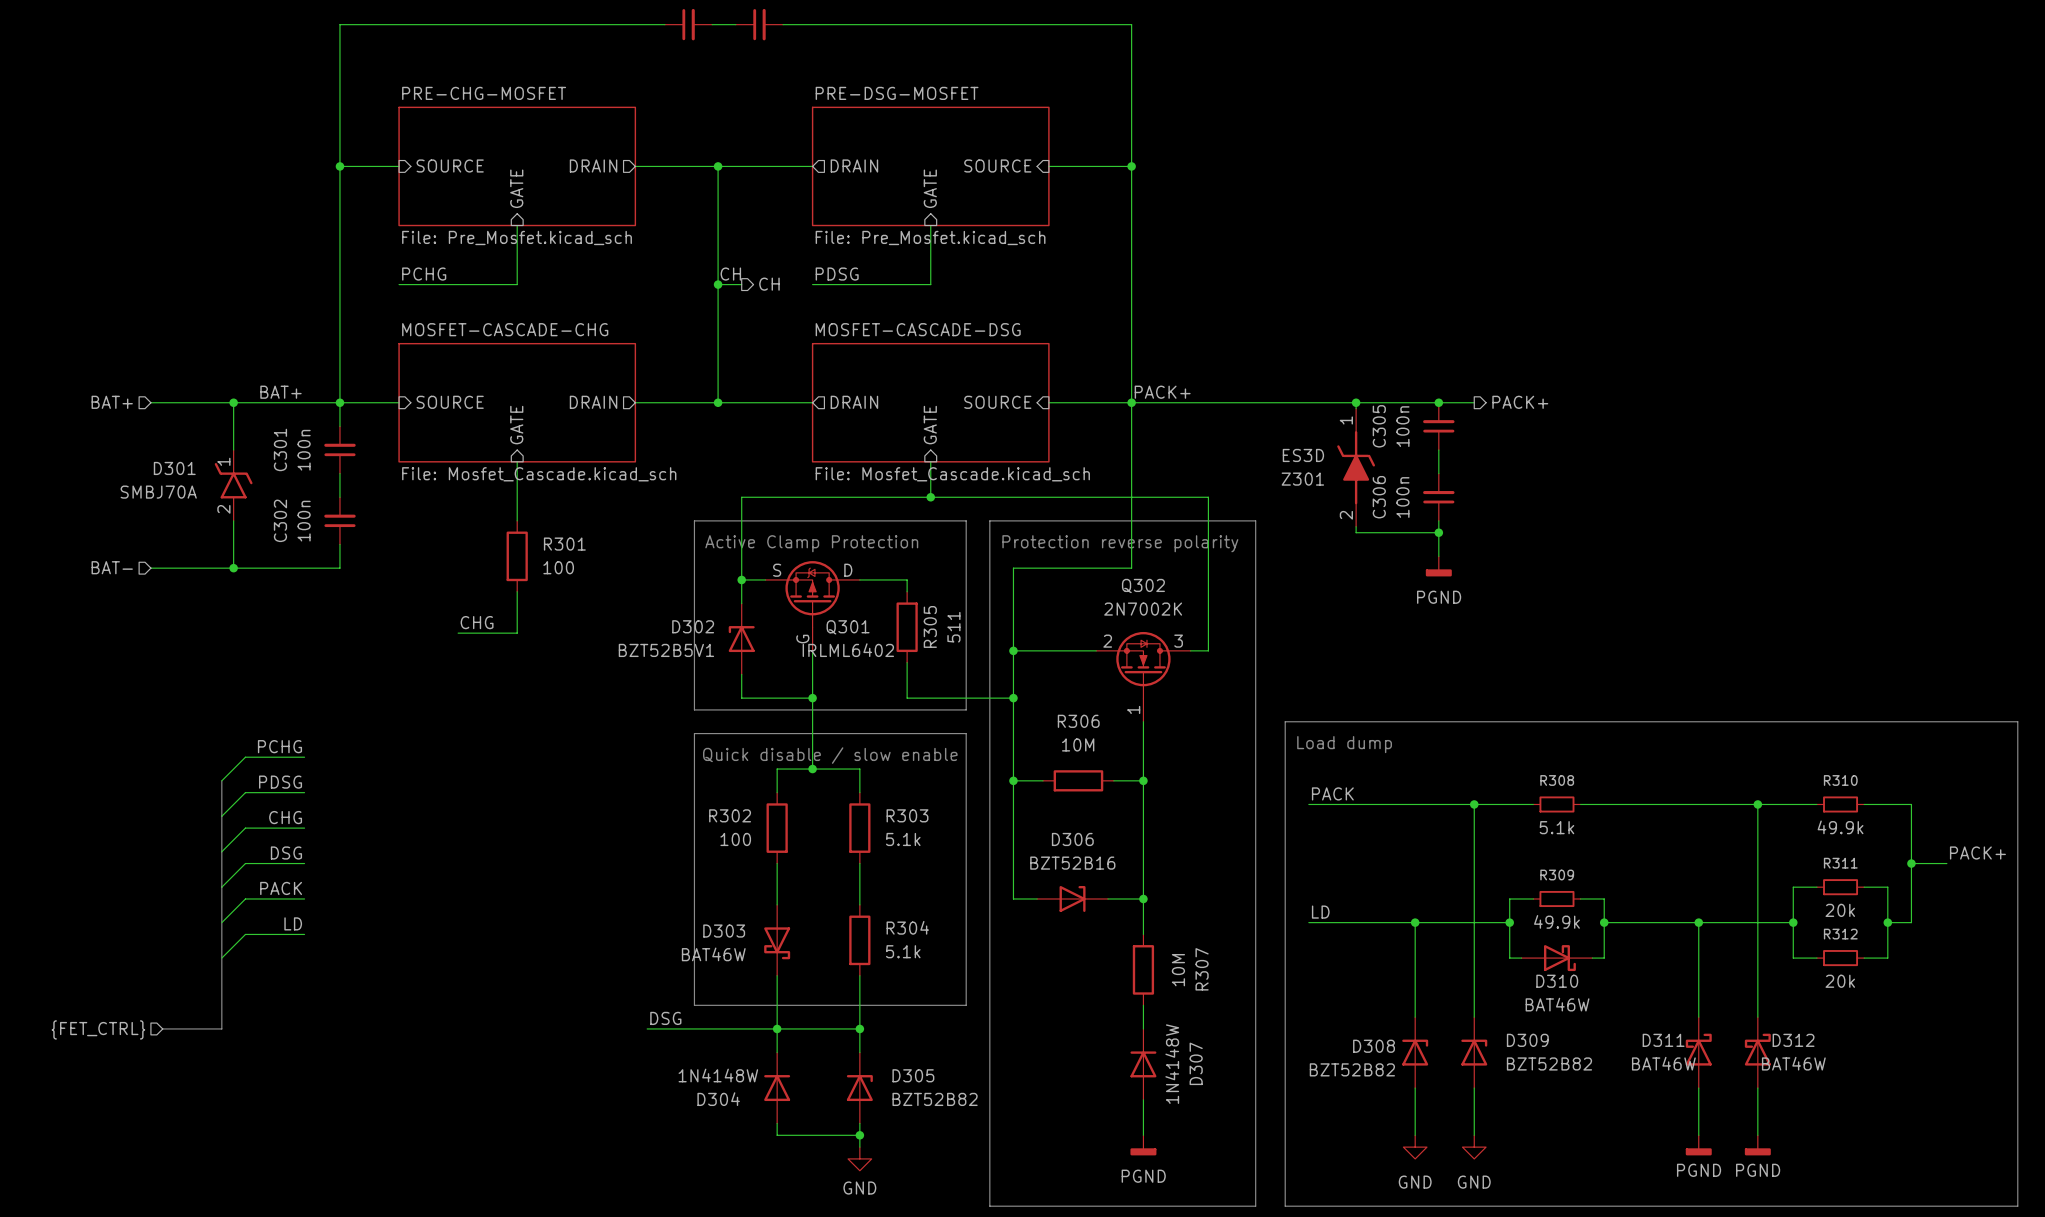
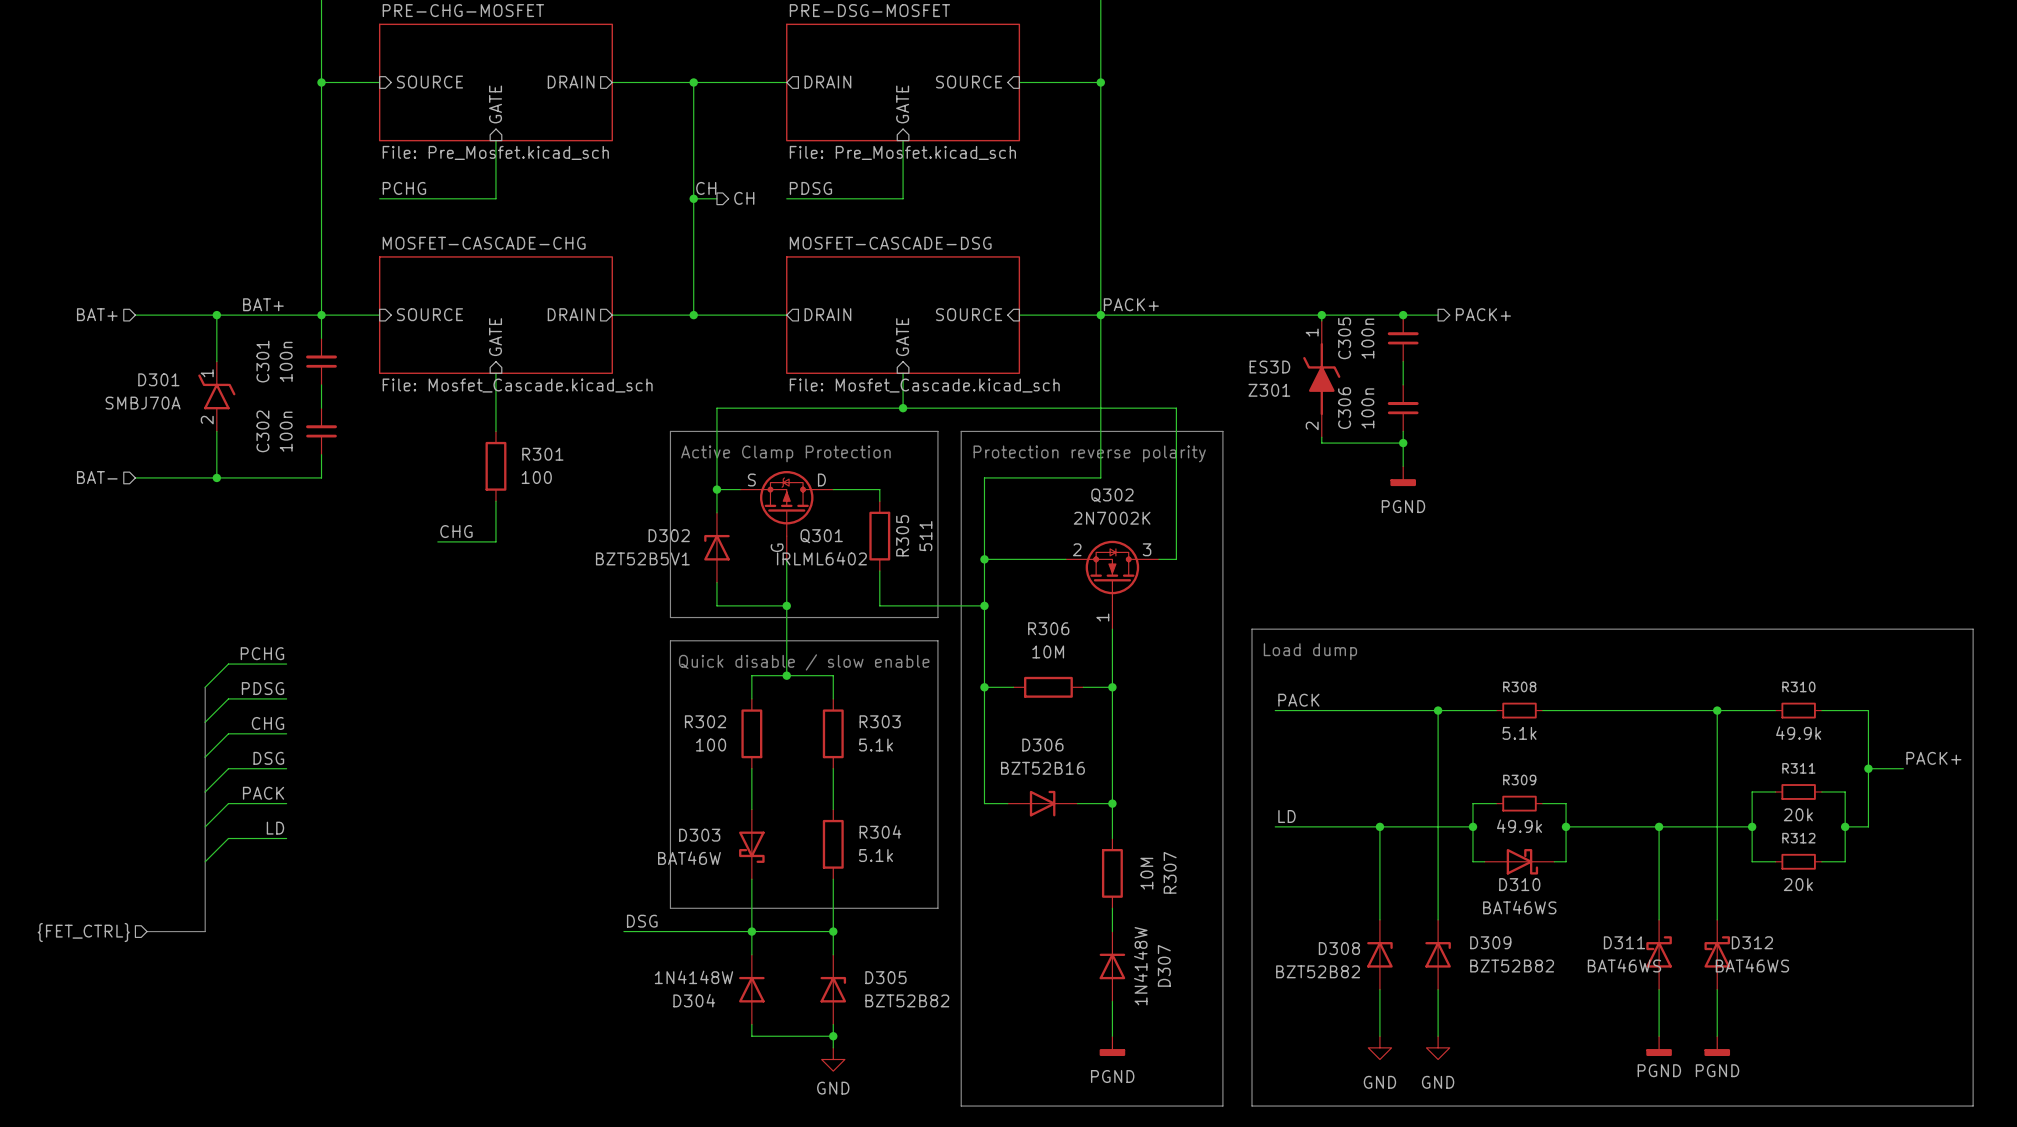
D310 value: BAT46W (1557, 1004) -> BAT46WS (1519, 907)
D311 value: BAT46W (1663, 1063) -> BAT46WS (1624, 965)
D312 value: BAT46W (1793, 1063) -> BAT46WS (1752, 965)

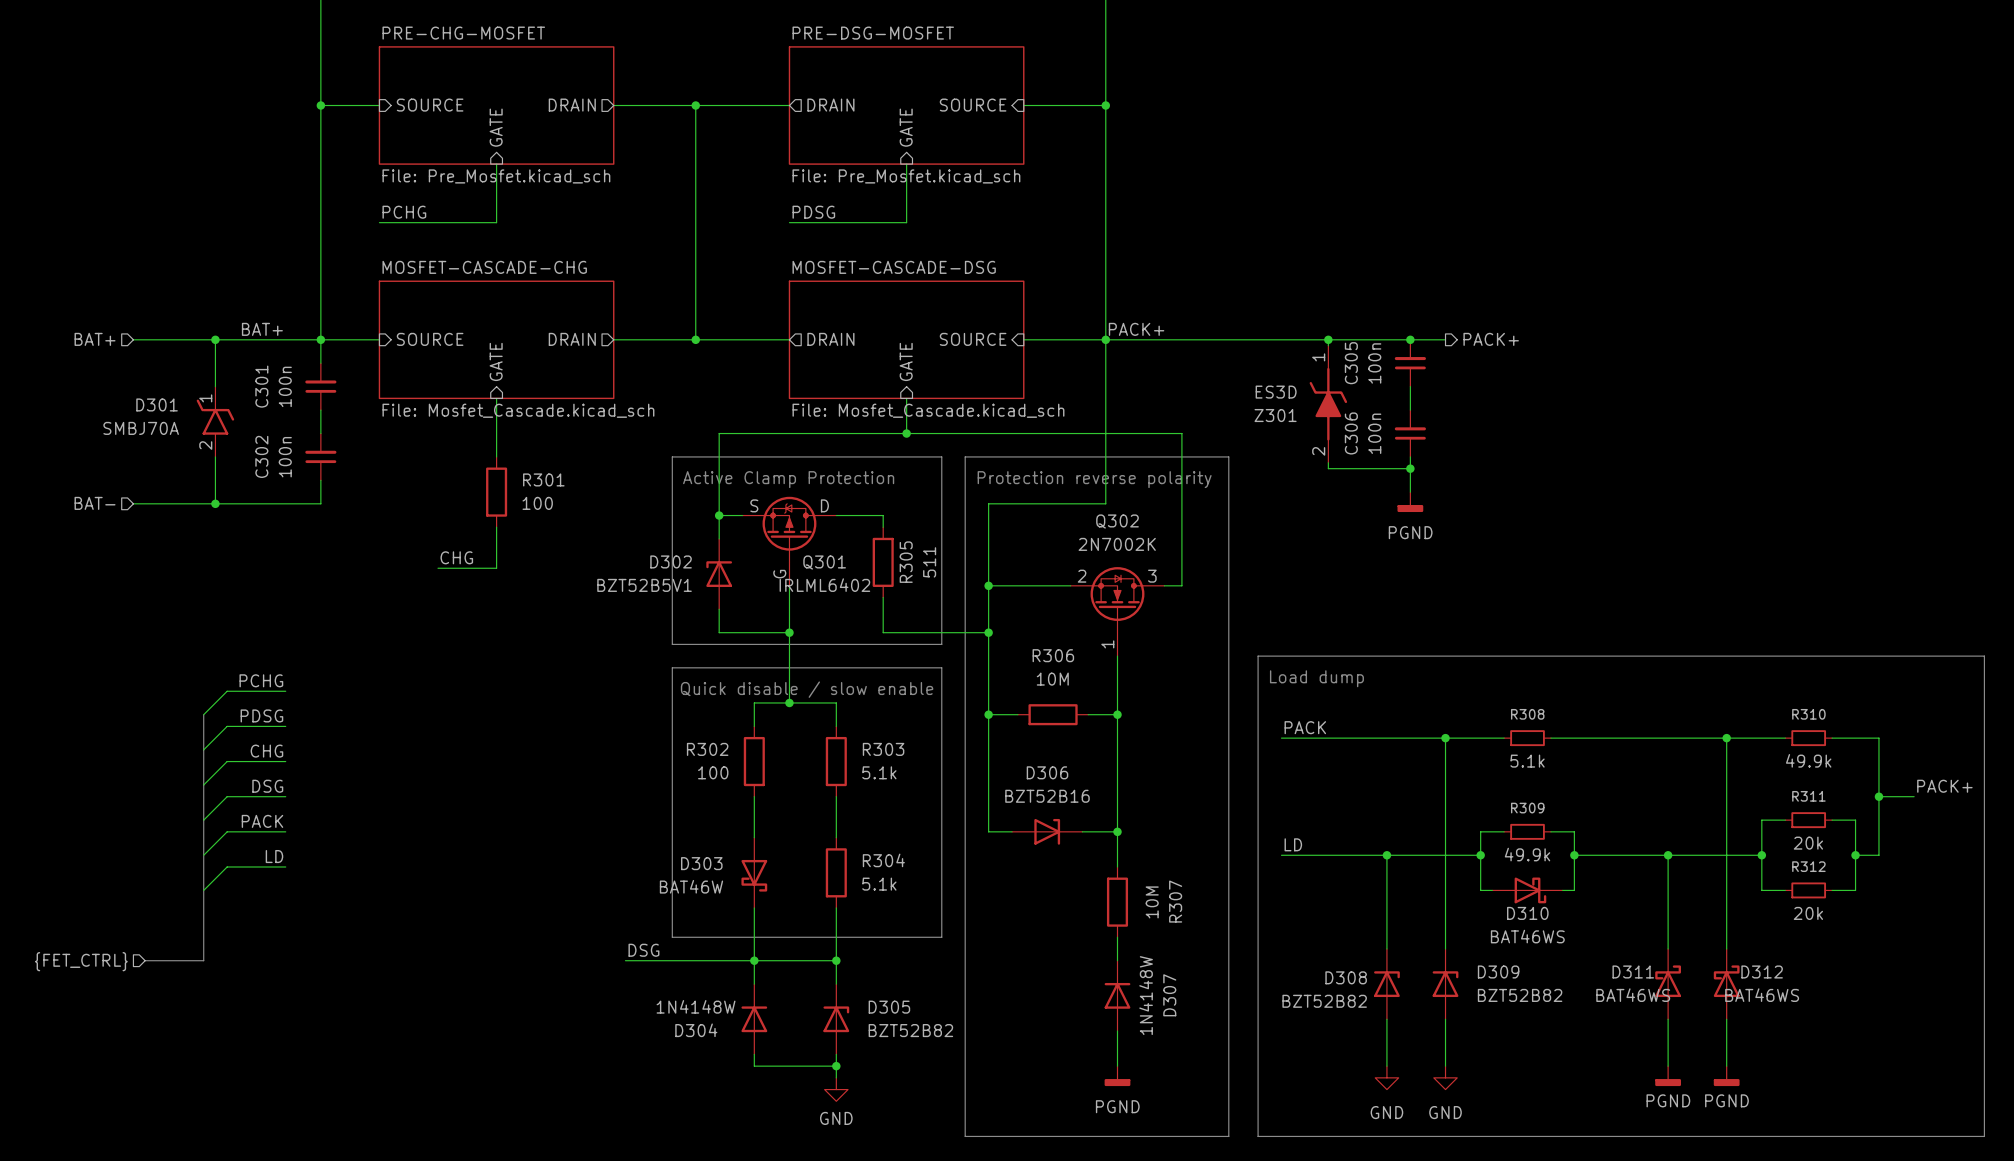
label: CH (706, 188) -> none
wire: (693, 198) (716, 198) -> none
junction: (693, 198) -> none
hierarchical label: CH (744, 198) -> none

